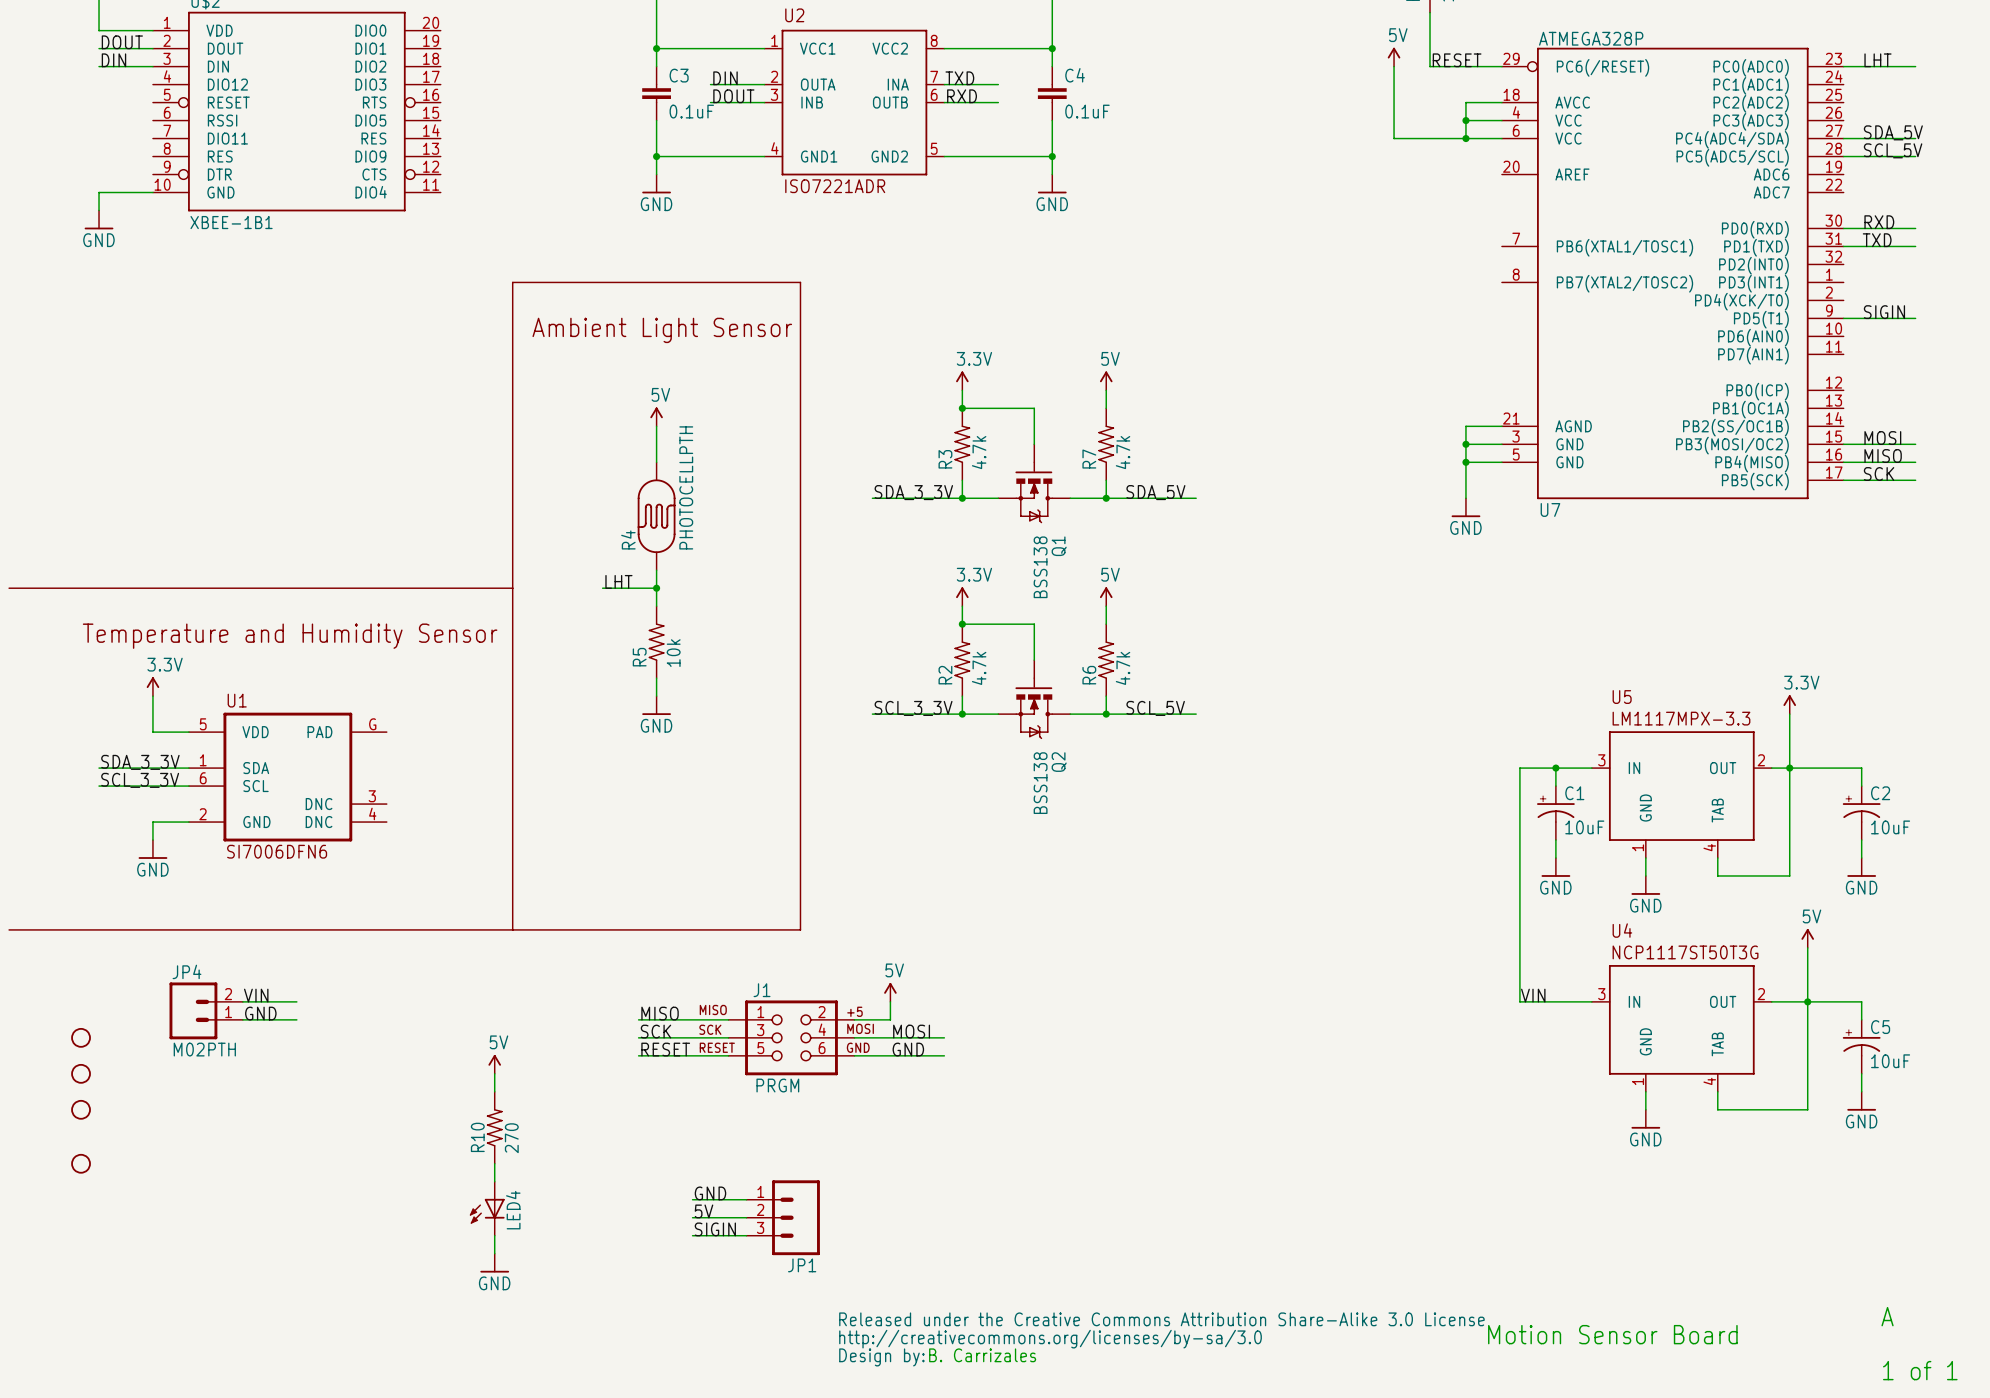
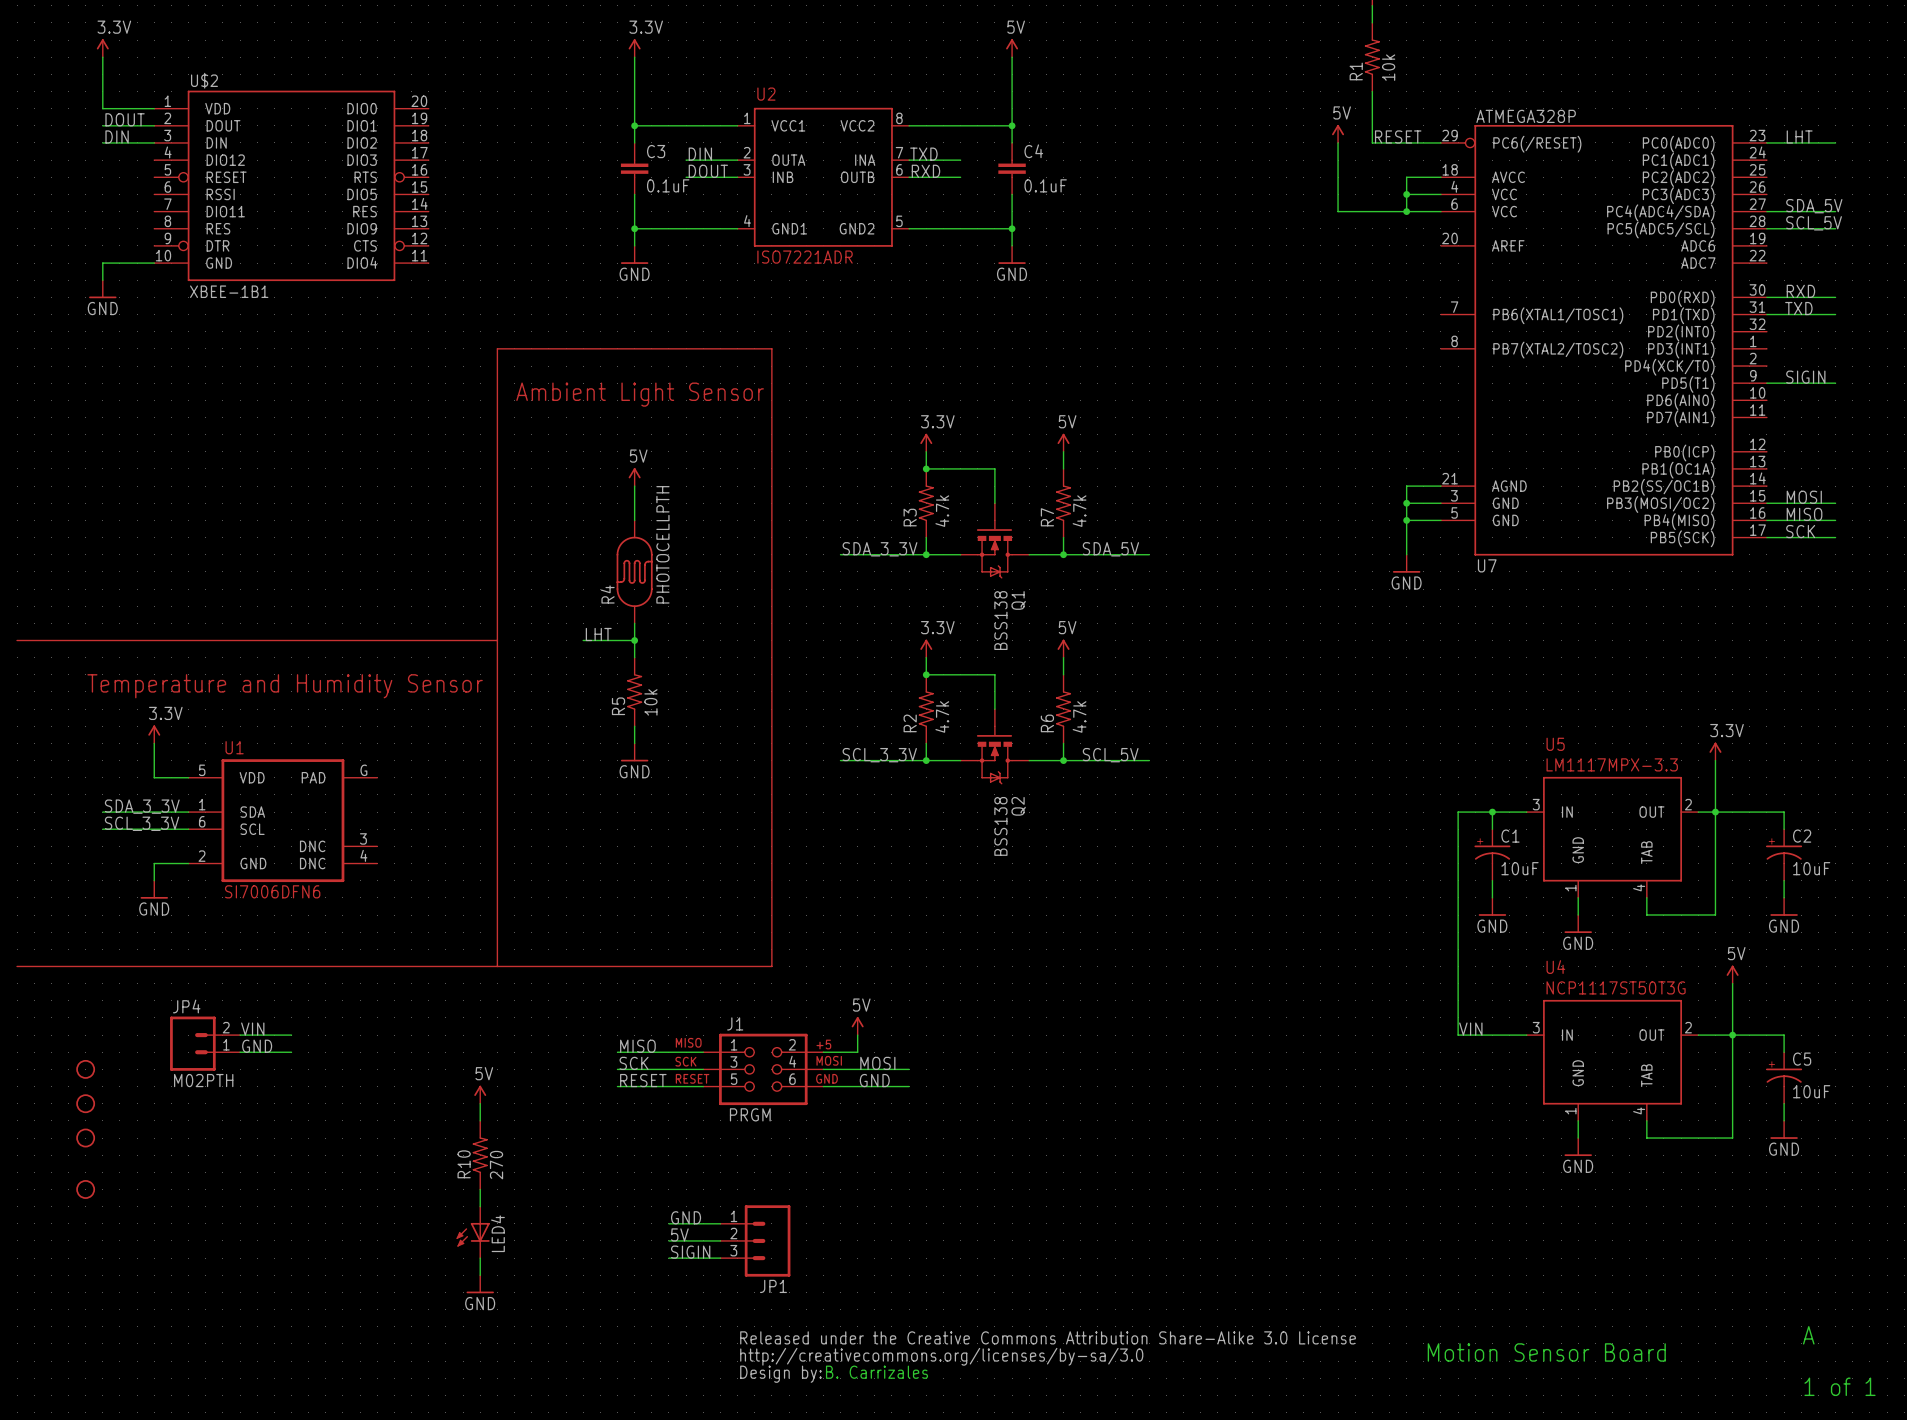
part position: (1161, 1339) -> (1048, 1357)
text position: B. Carrizales (982, 1355) -> B. Carrizales (876, 1372)

